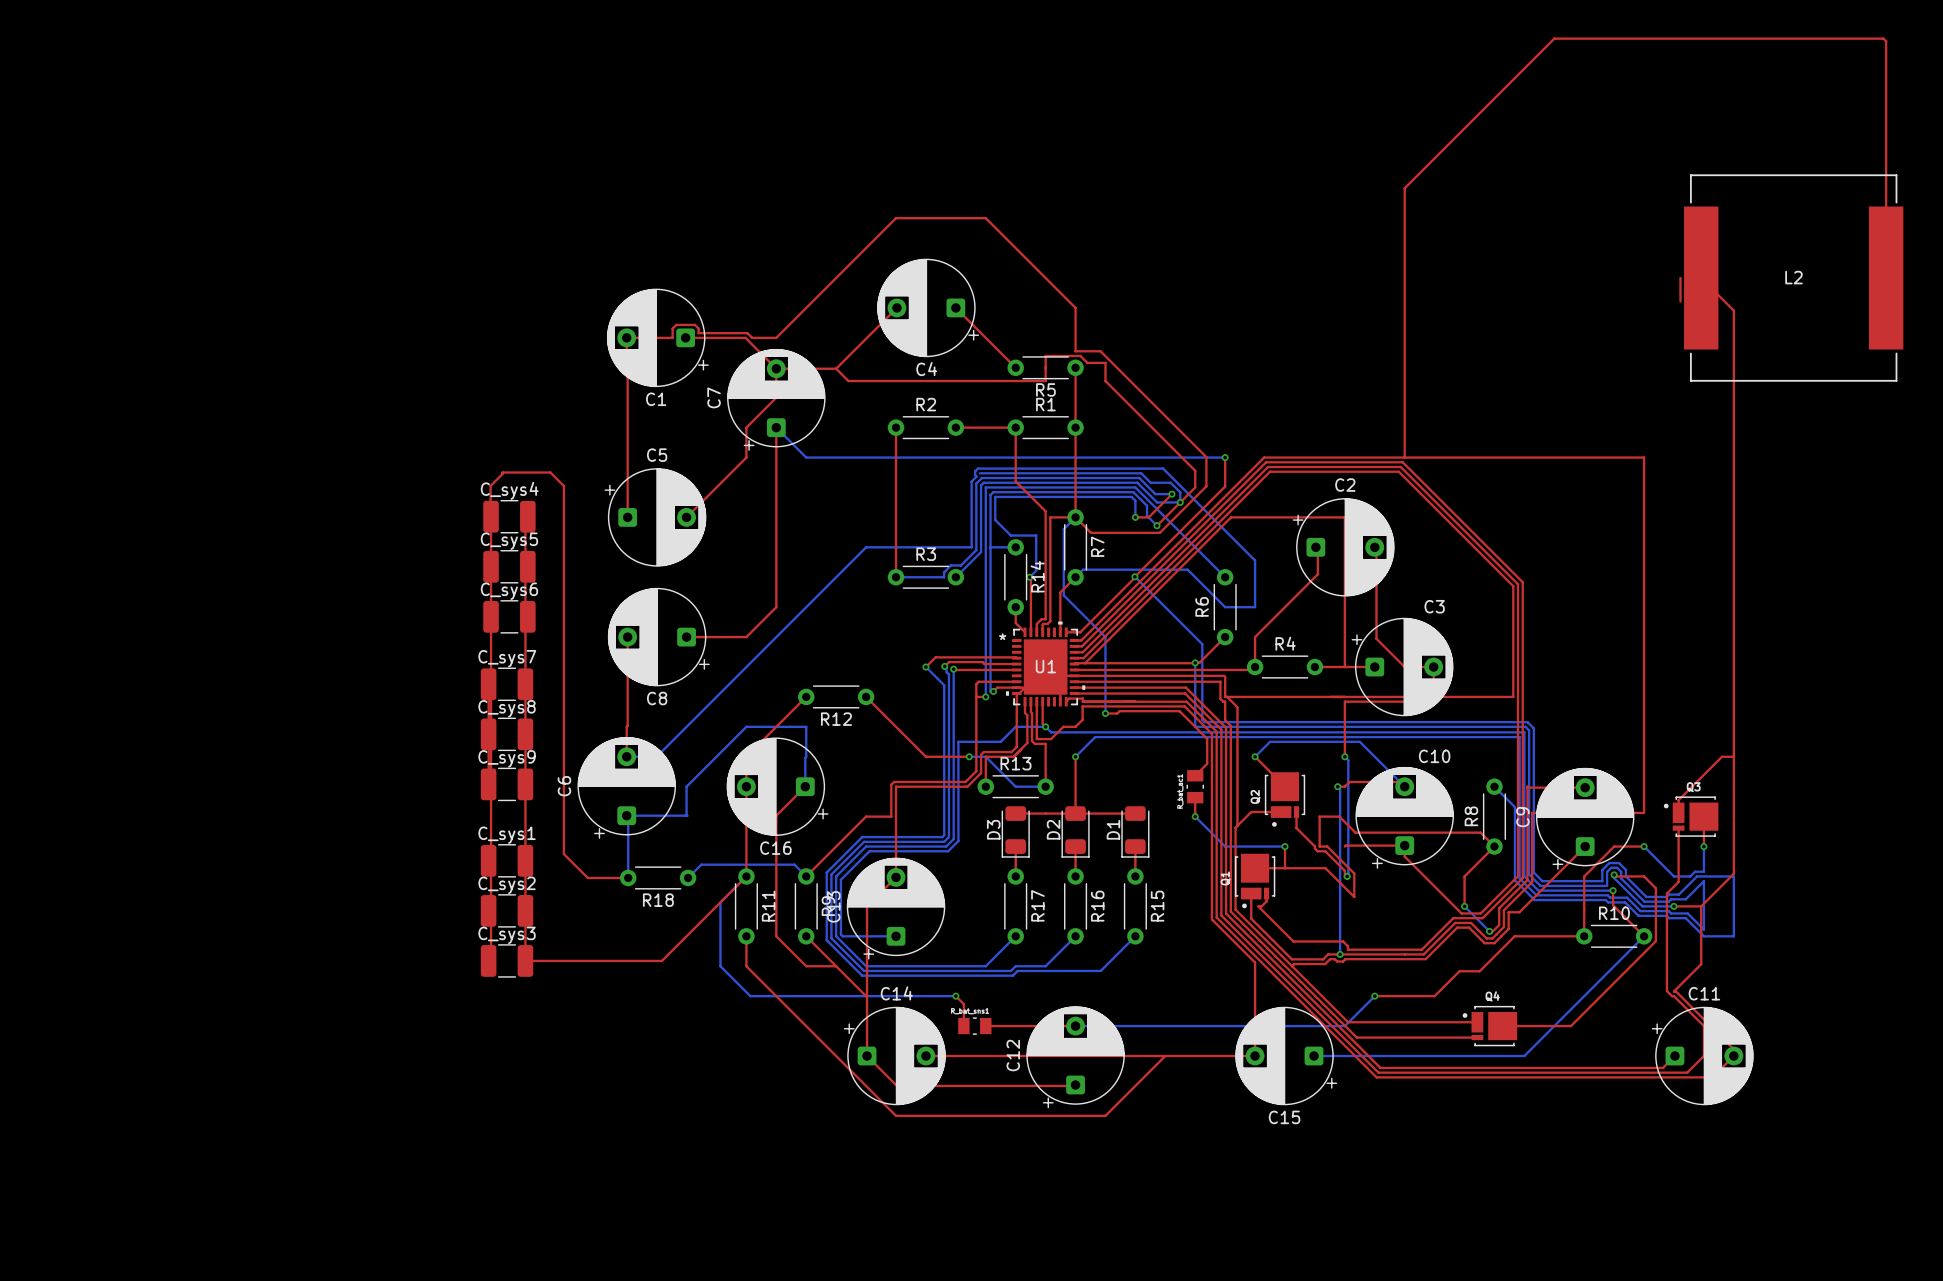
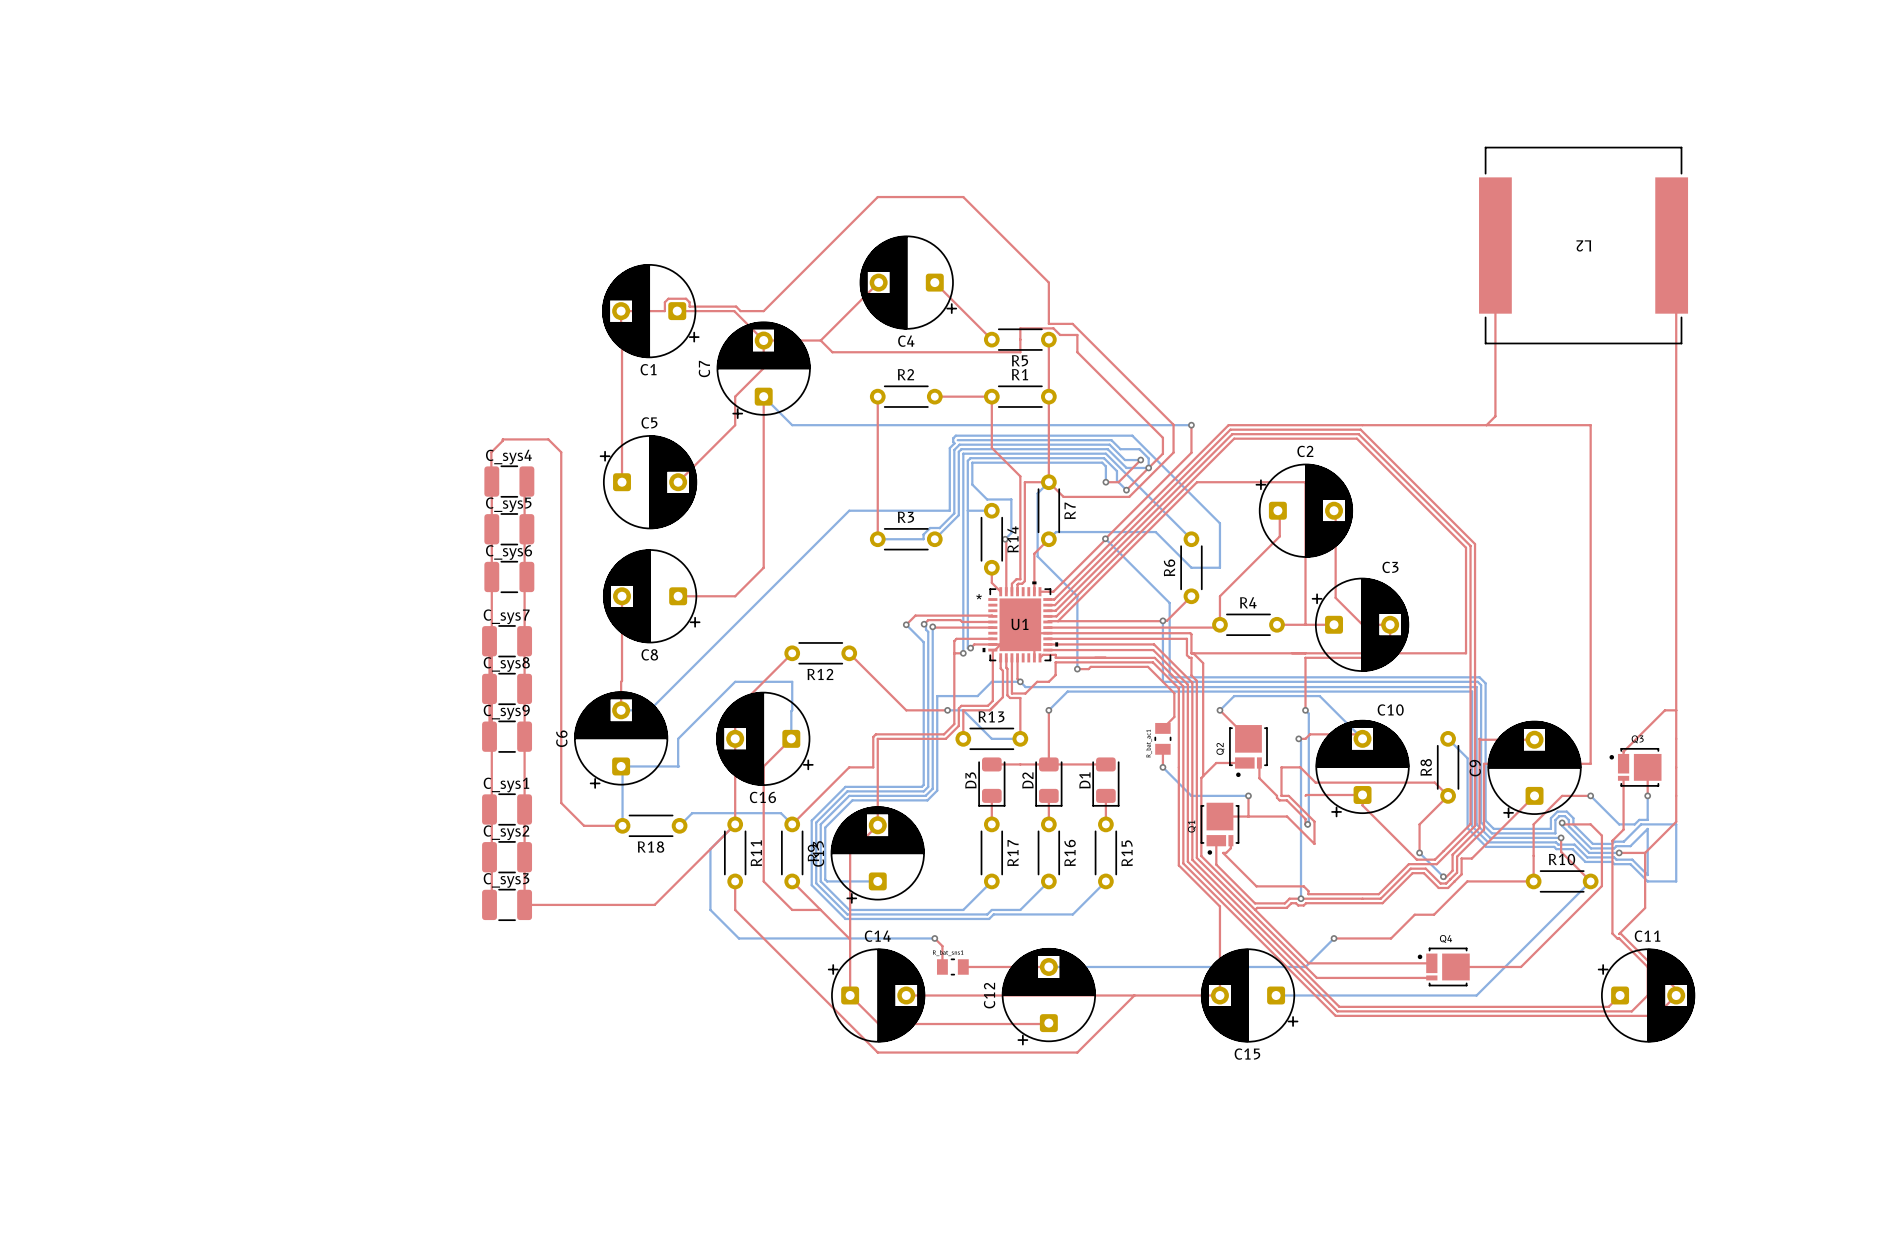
top track: none -> (1495, 245) (1495, 416) (1486, 425)
L2 name rotation: 0° (1793, 277) -> 180° (1583, 245)
top track: (1680, 278) (1680, 301) -> none
top track: (1701, 278) (1733, 310) -> none
L2 position: (1793, 278) -> (1583, 245)
top track: (1886, 278) (1886, 41) (1883, 38) (1554, 38) (1404, 188) (1404, 457) -> none

